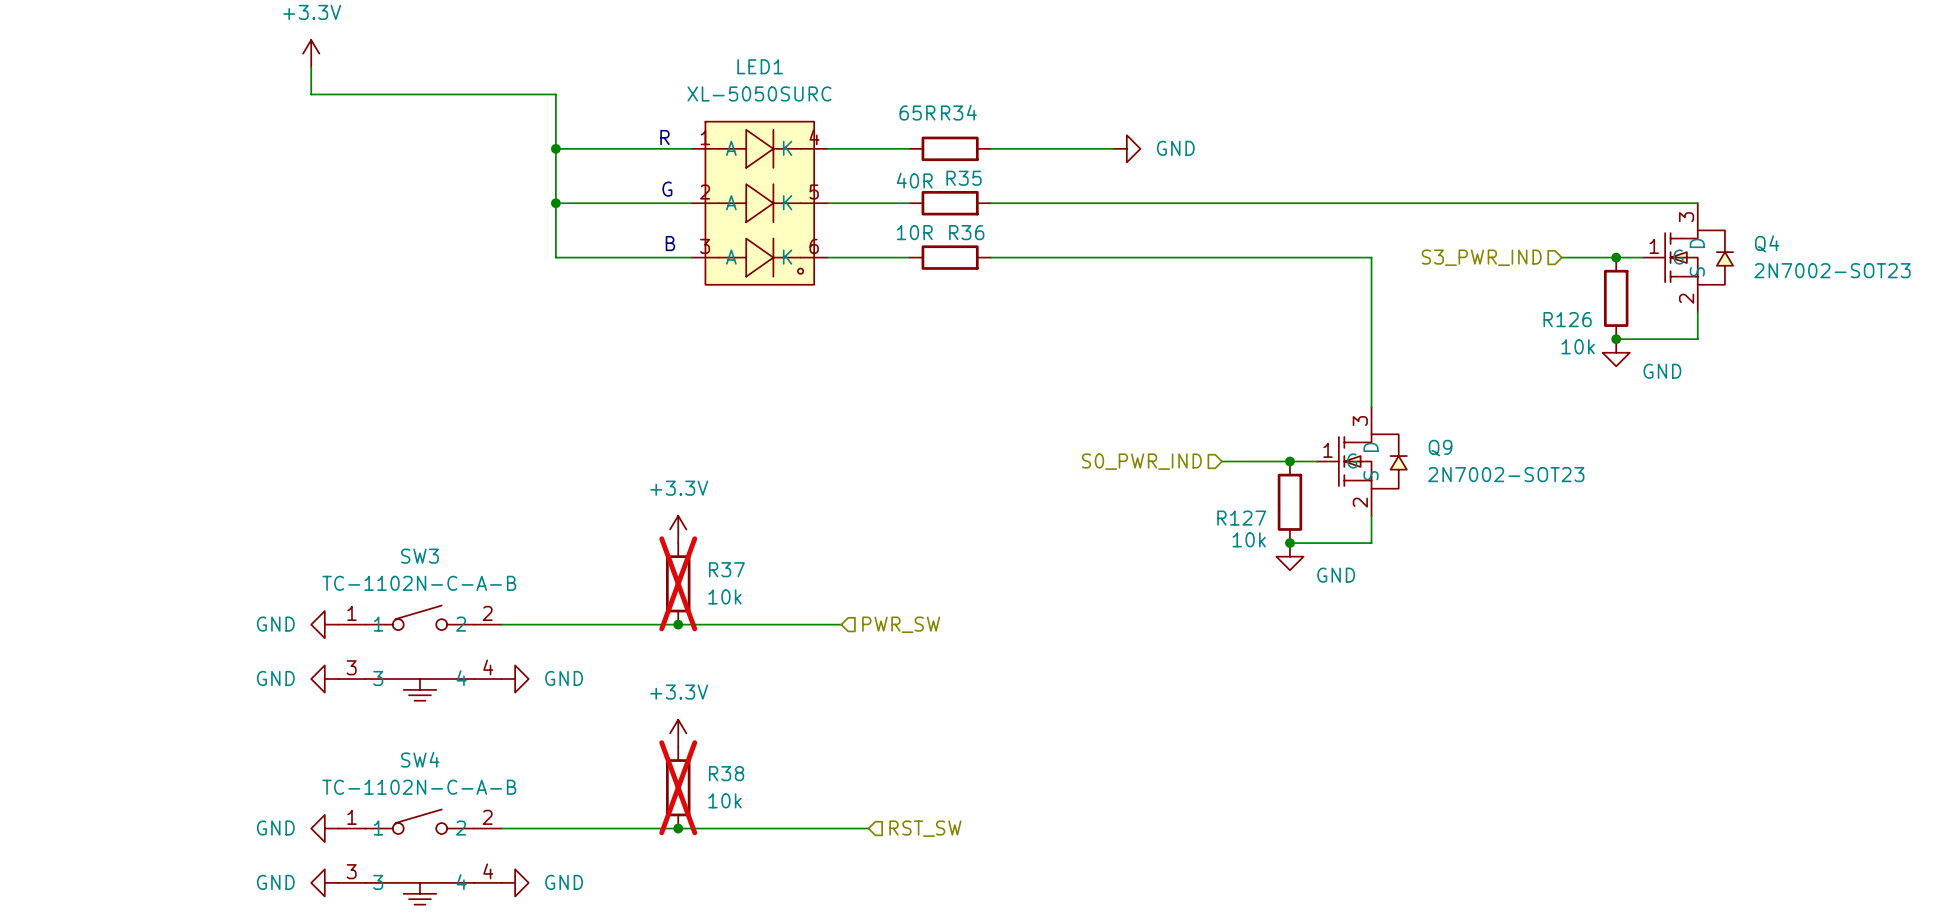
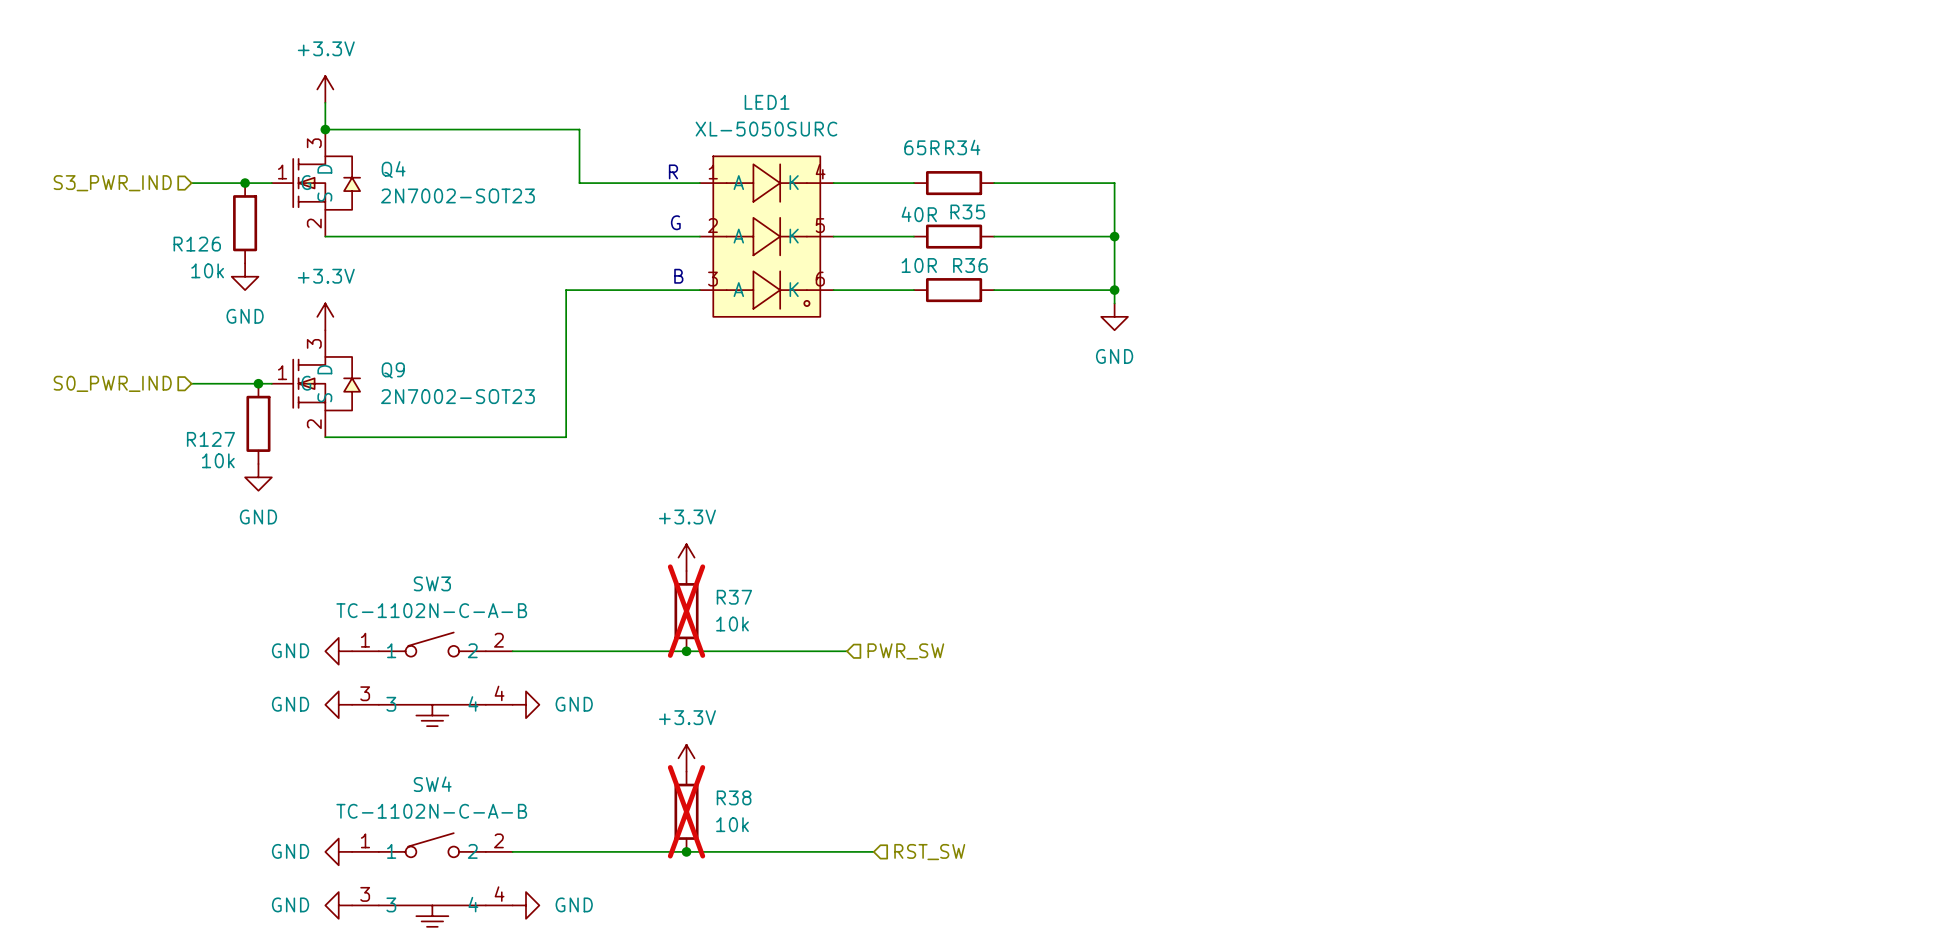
junction: none -> (325, 129)
wire: (555, 94) (555, 257) -> (325, 437) (566, 437) (566, 290)
hierarchical label: none -> S3_PWR_IND (112, 183)
wire: none -> (191, 183) (271, 183)
junction: none -> (245, 183)
wire: (555, 148) (569, 148) -> (566, 129) (579, 129) (579, 183)
junction: (555, 148) -> none
wire: none -> (1114, 183) (1114, 303)
power symbol rotation: 0° (1126, 148) -> 90° clockwise (1114, 316)
power symbol position: GND (1126, 148) -> GND (1114, 316)
wire: none -> (325, 236) (566, 236)
junction: (555, 203) -> none
wire: (1113, 203) (1697, 203) -> none
junction: none -> (1114, 236)
power symbol: none -> GND (245, 276)
wire: (1113, 257) (1371, 257) (1371, 407) -> none
junction: none -> (1114, 290)
hierarchical label: S3_PWR_IND (1481, 257) -> none
wire: (1561, 257) (1643, 257) -> none
junction: (1616, 257) -> none
Q4 position: (1688, 257) -> (315, 183)
power symbol: none -> +3.3V (325, 316)
R126 position: (1616, 298) -> (245, 223)
wire: (1697, 311) (1697, 339) (1616, 339) -> none
junction: (1616, 339) -> none
hierarchical label: none -> S0_PWR_IND (112, 383)
wire: none -> (191, 383) (271, 383)
junction: none -> (258, 383)
power symbol: GND (1616, 352) -> none
power symbol: none -> GND (258, 477)
hierarchical label: S0_PWR_IND (1141, 461) -> none
wire: (1221, 461) (1317, 461) -> none
junction: (1289, 461) -> none
Q9 position: (1361, 461) -> (315, 383)
R127 position: (1289, 502) -> (258, 423)
wire: (1371, 515) (1371, 543) (1289, 543) -> none
junction: (1289, 543) -> none
power symbol: GND (1289, 556) -> none

